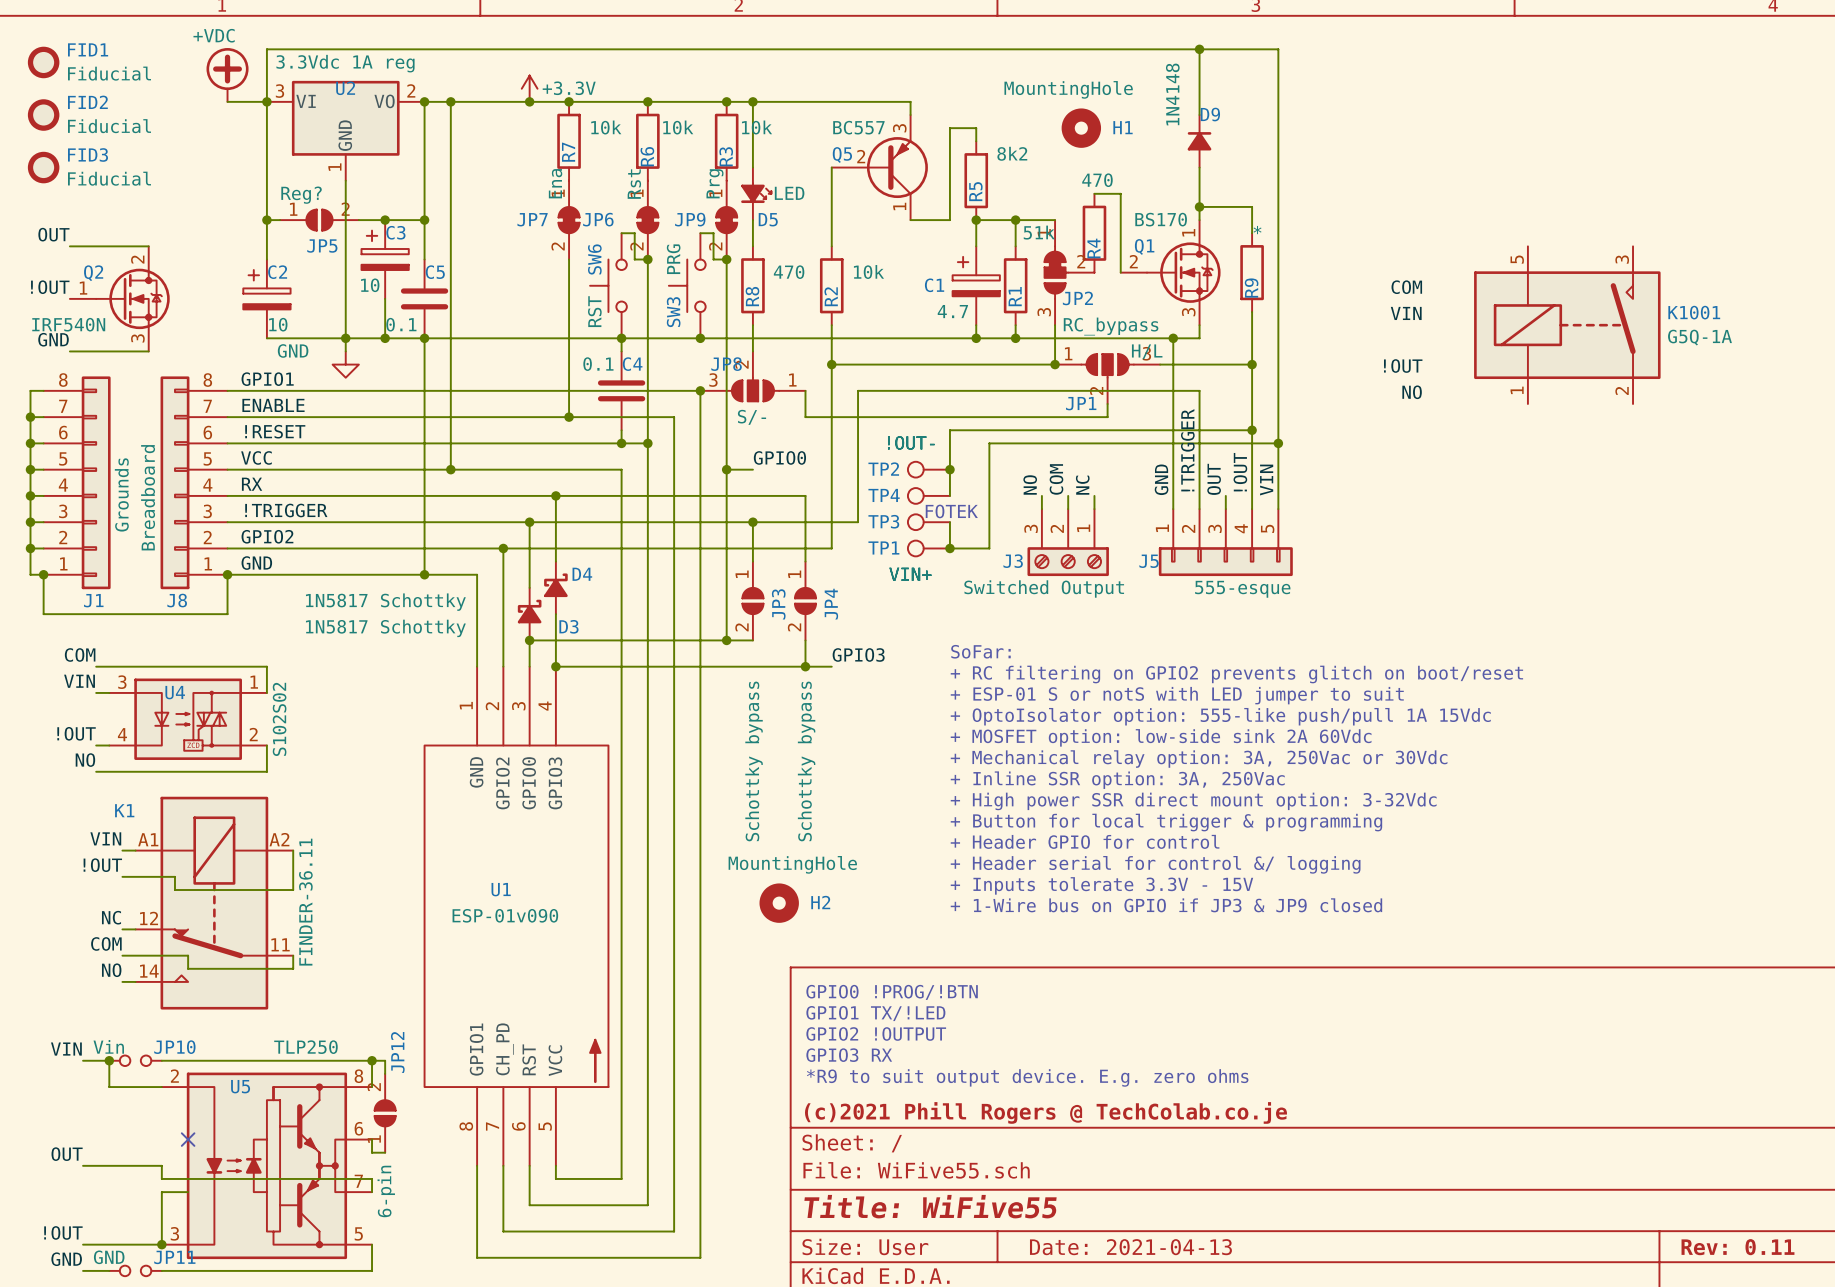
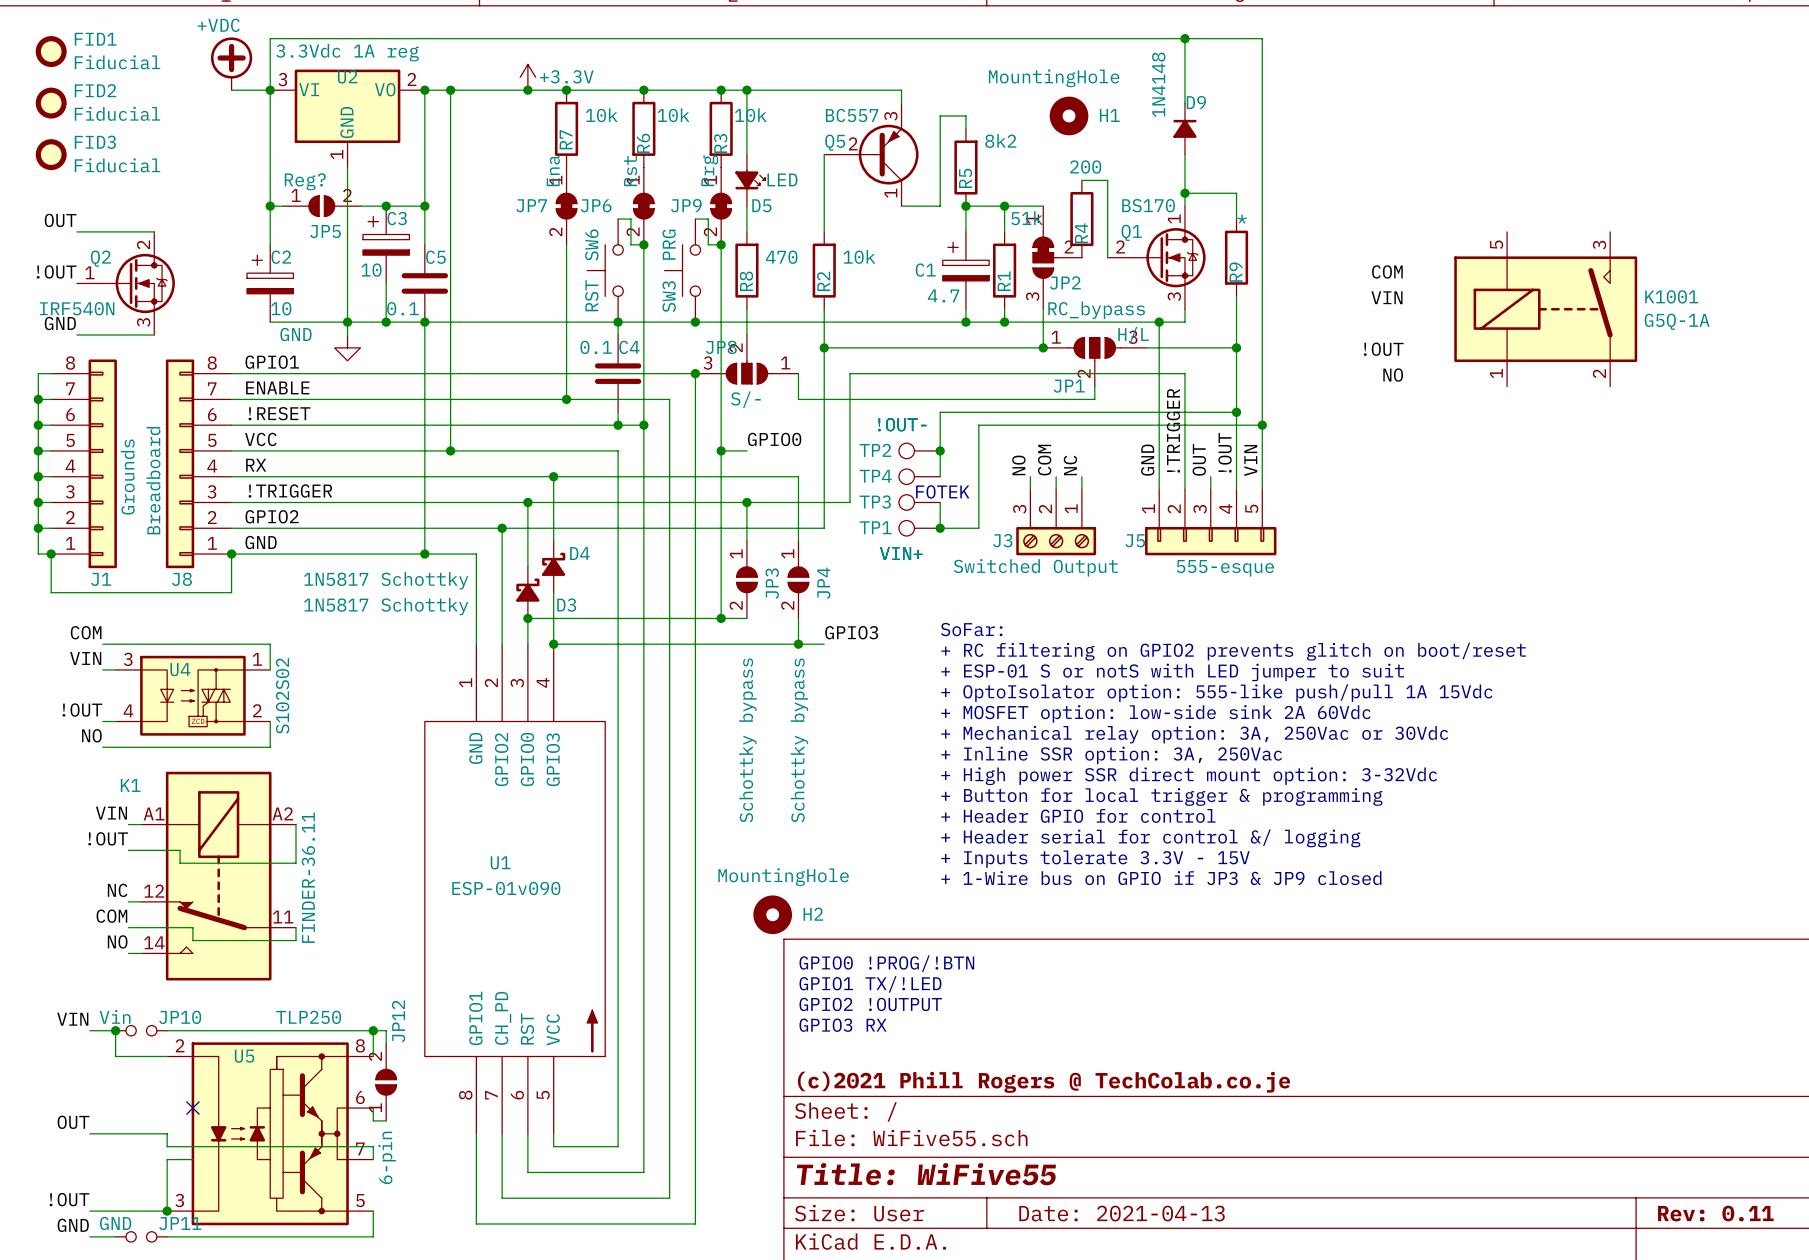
R4 value: 470 (1097, 180) -> 200 (1085, 167)
H2 position: (779, 903) -> (772, 914)
text: *R9 to suit output device. E.g. zero ohms (1027, 1077) -> none

